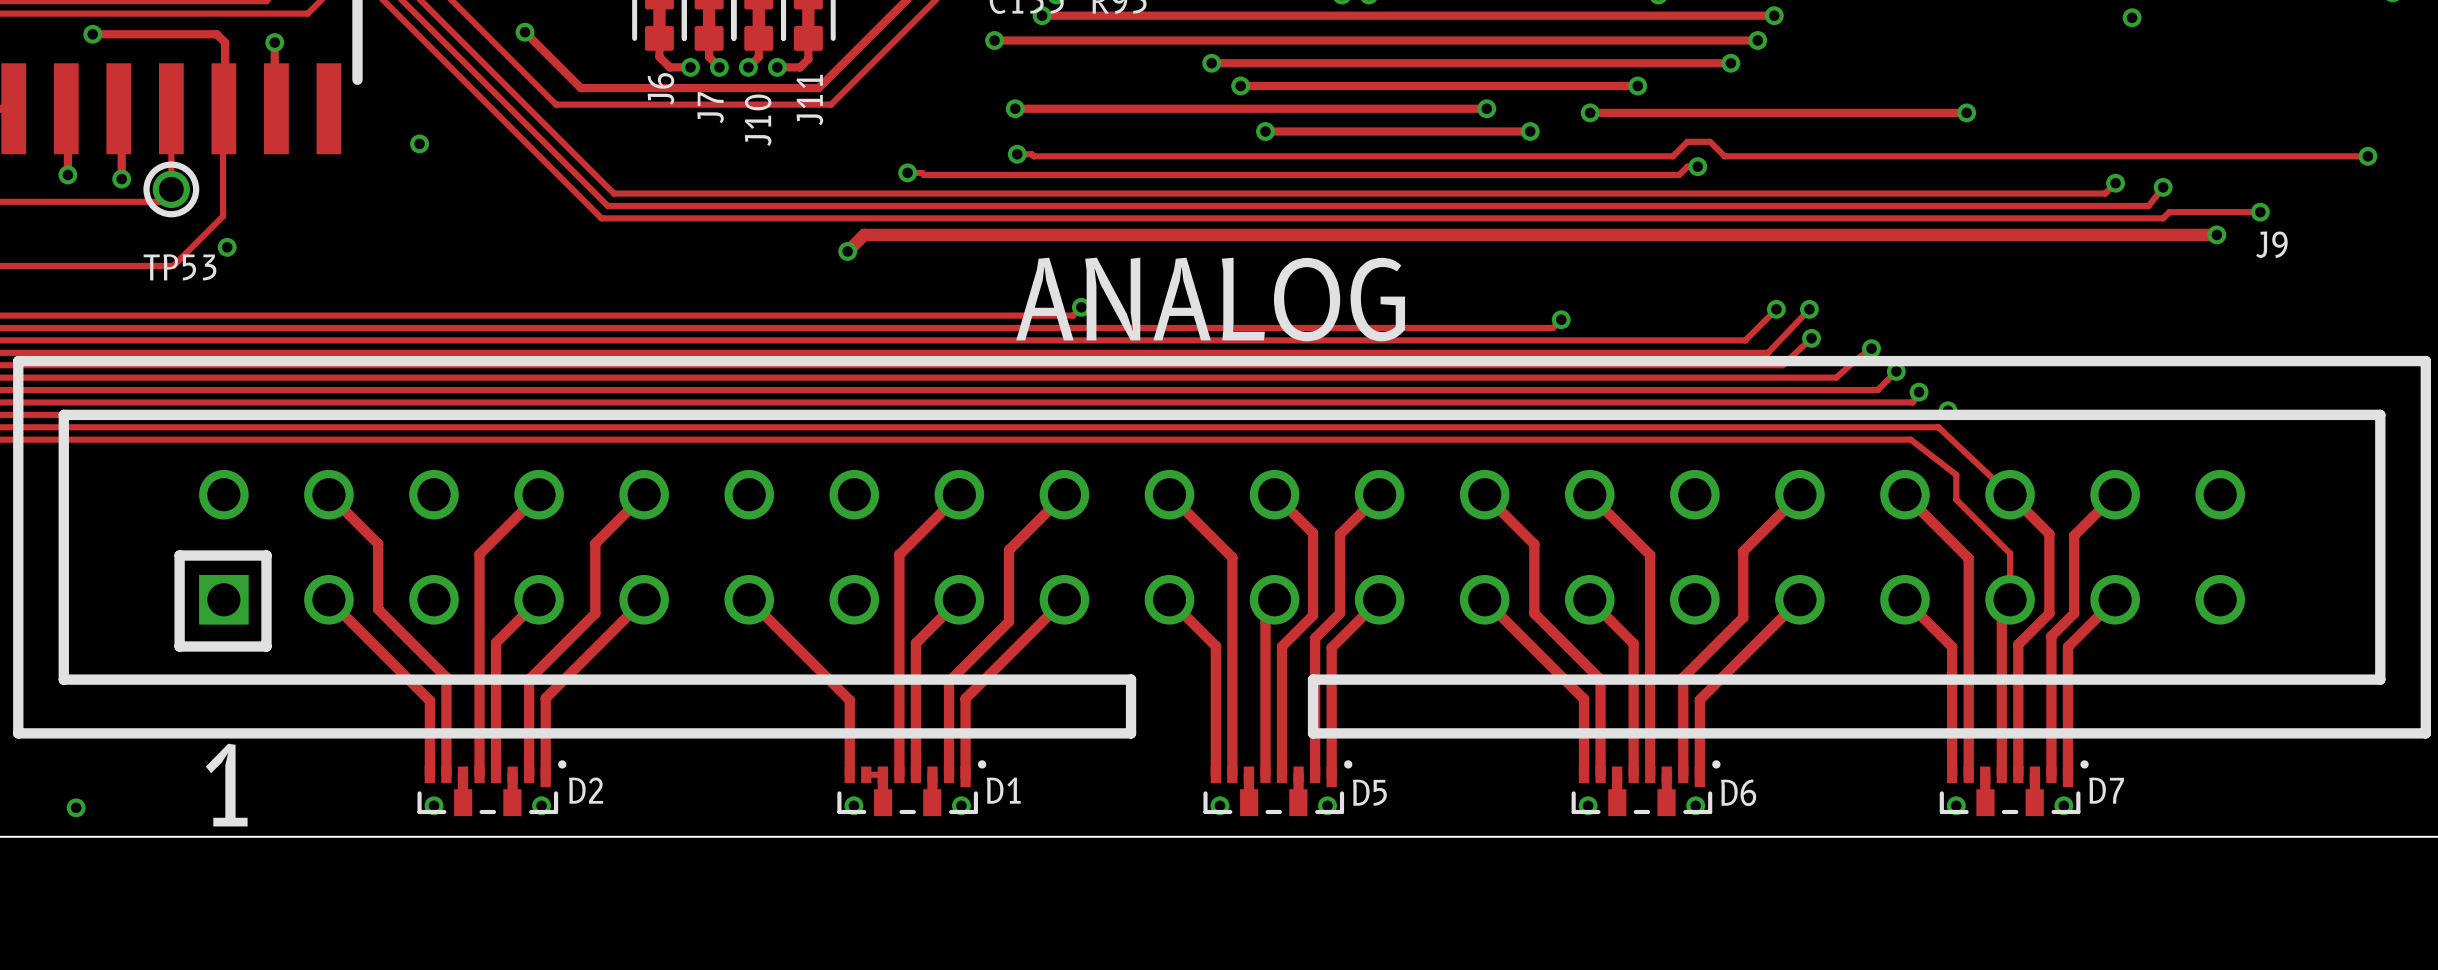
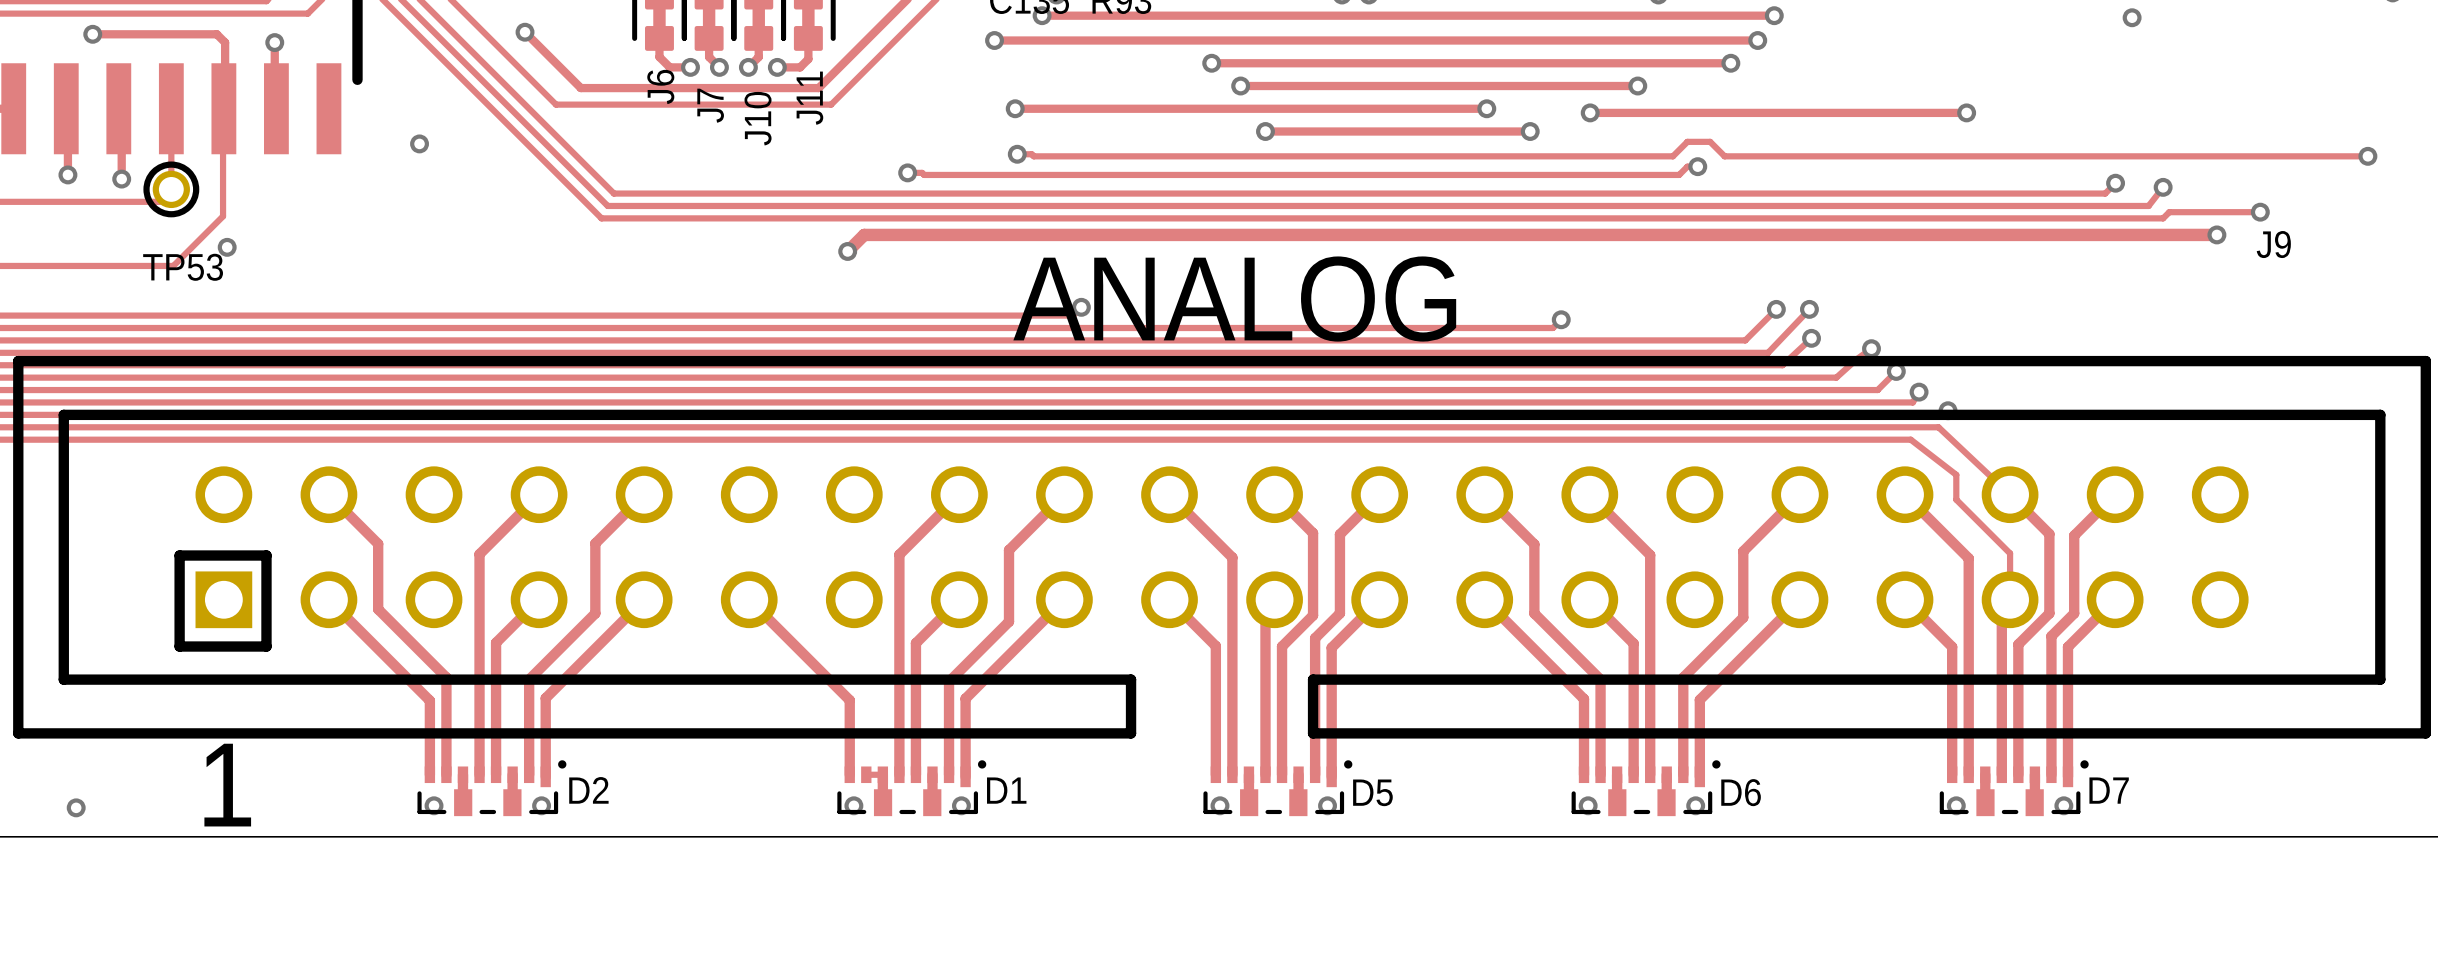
J9 footprint: [13, 355, 2431, 739] -> [13, 355, 2431, 739]

